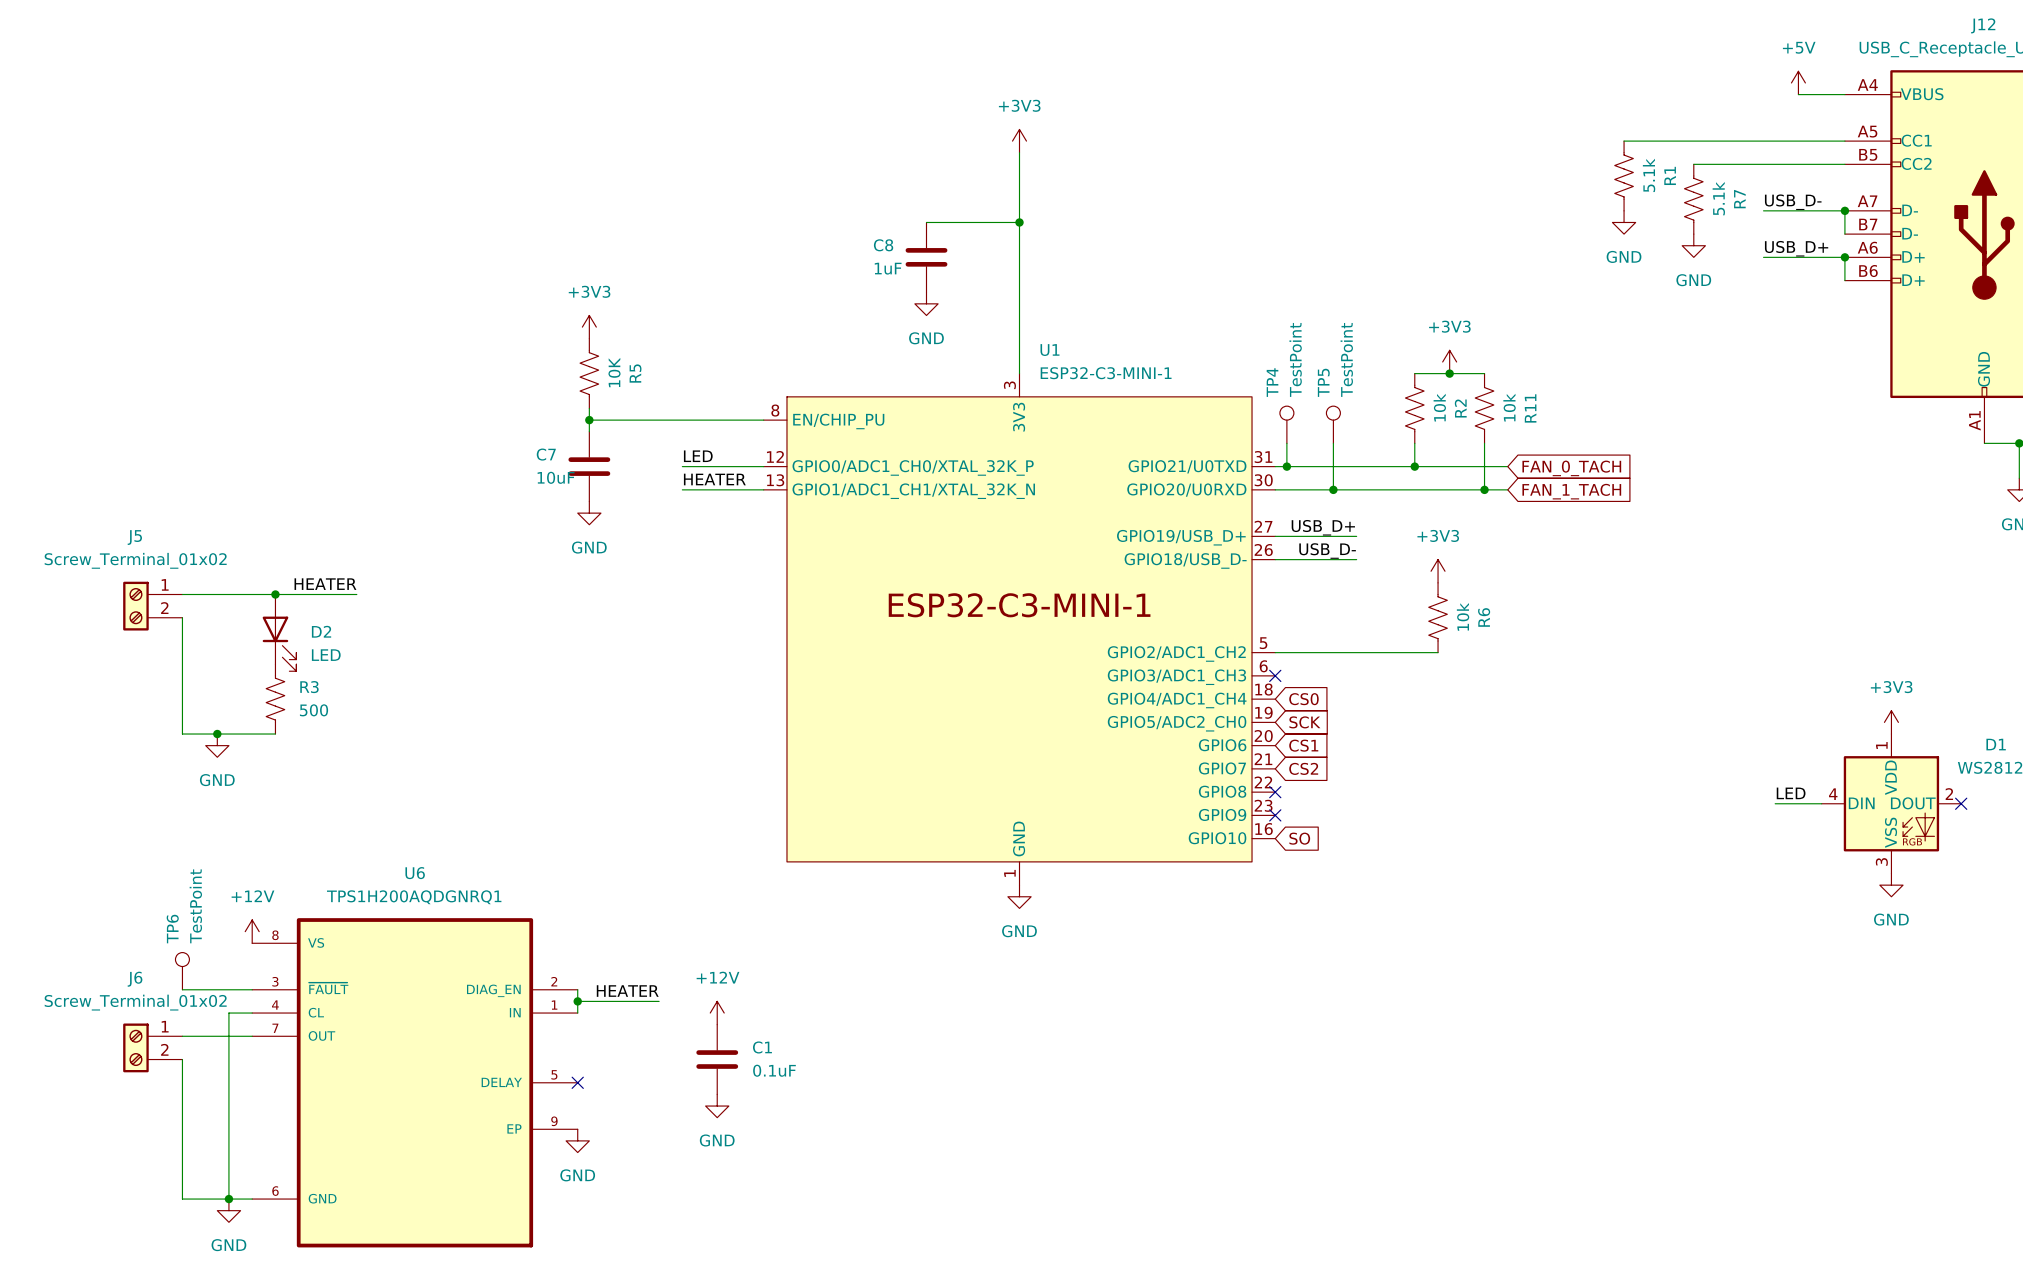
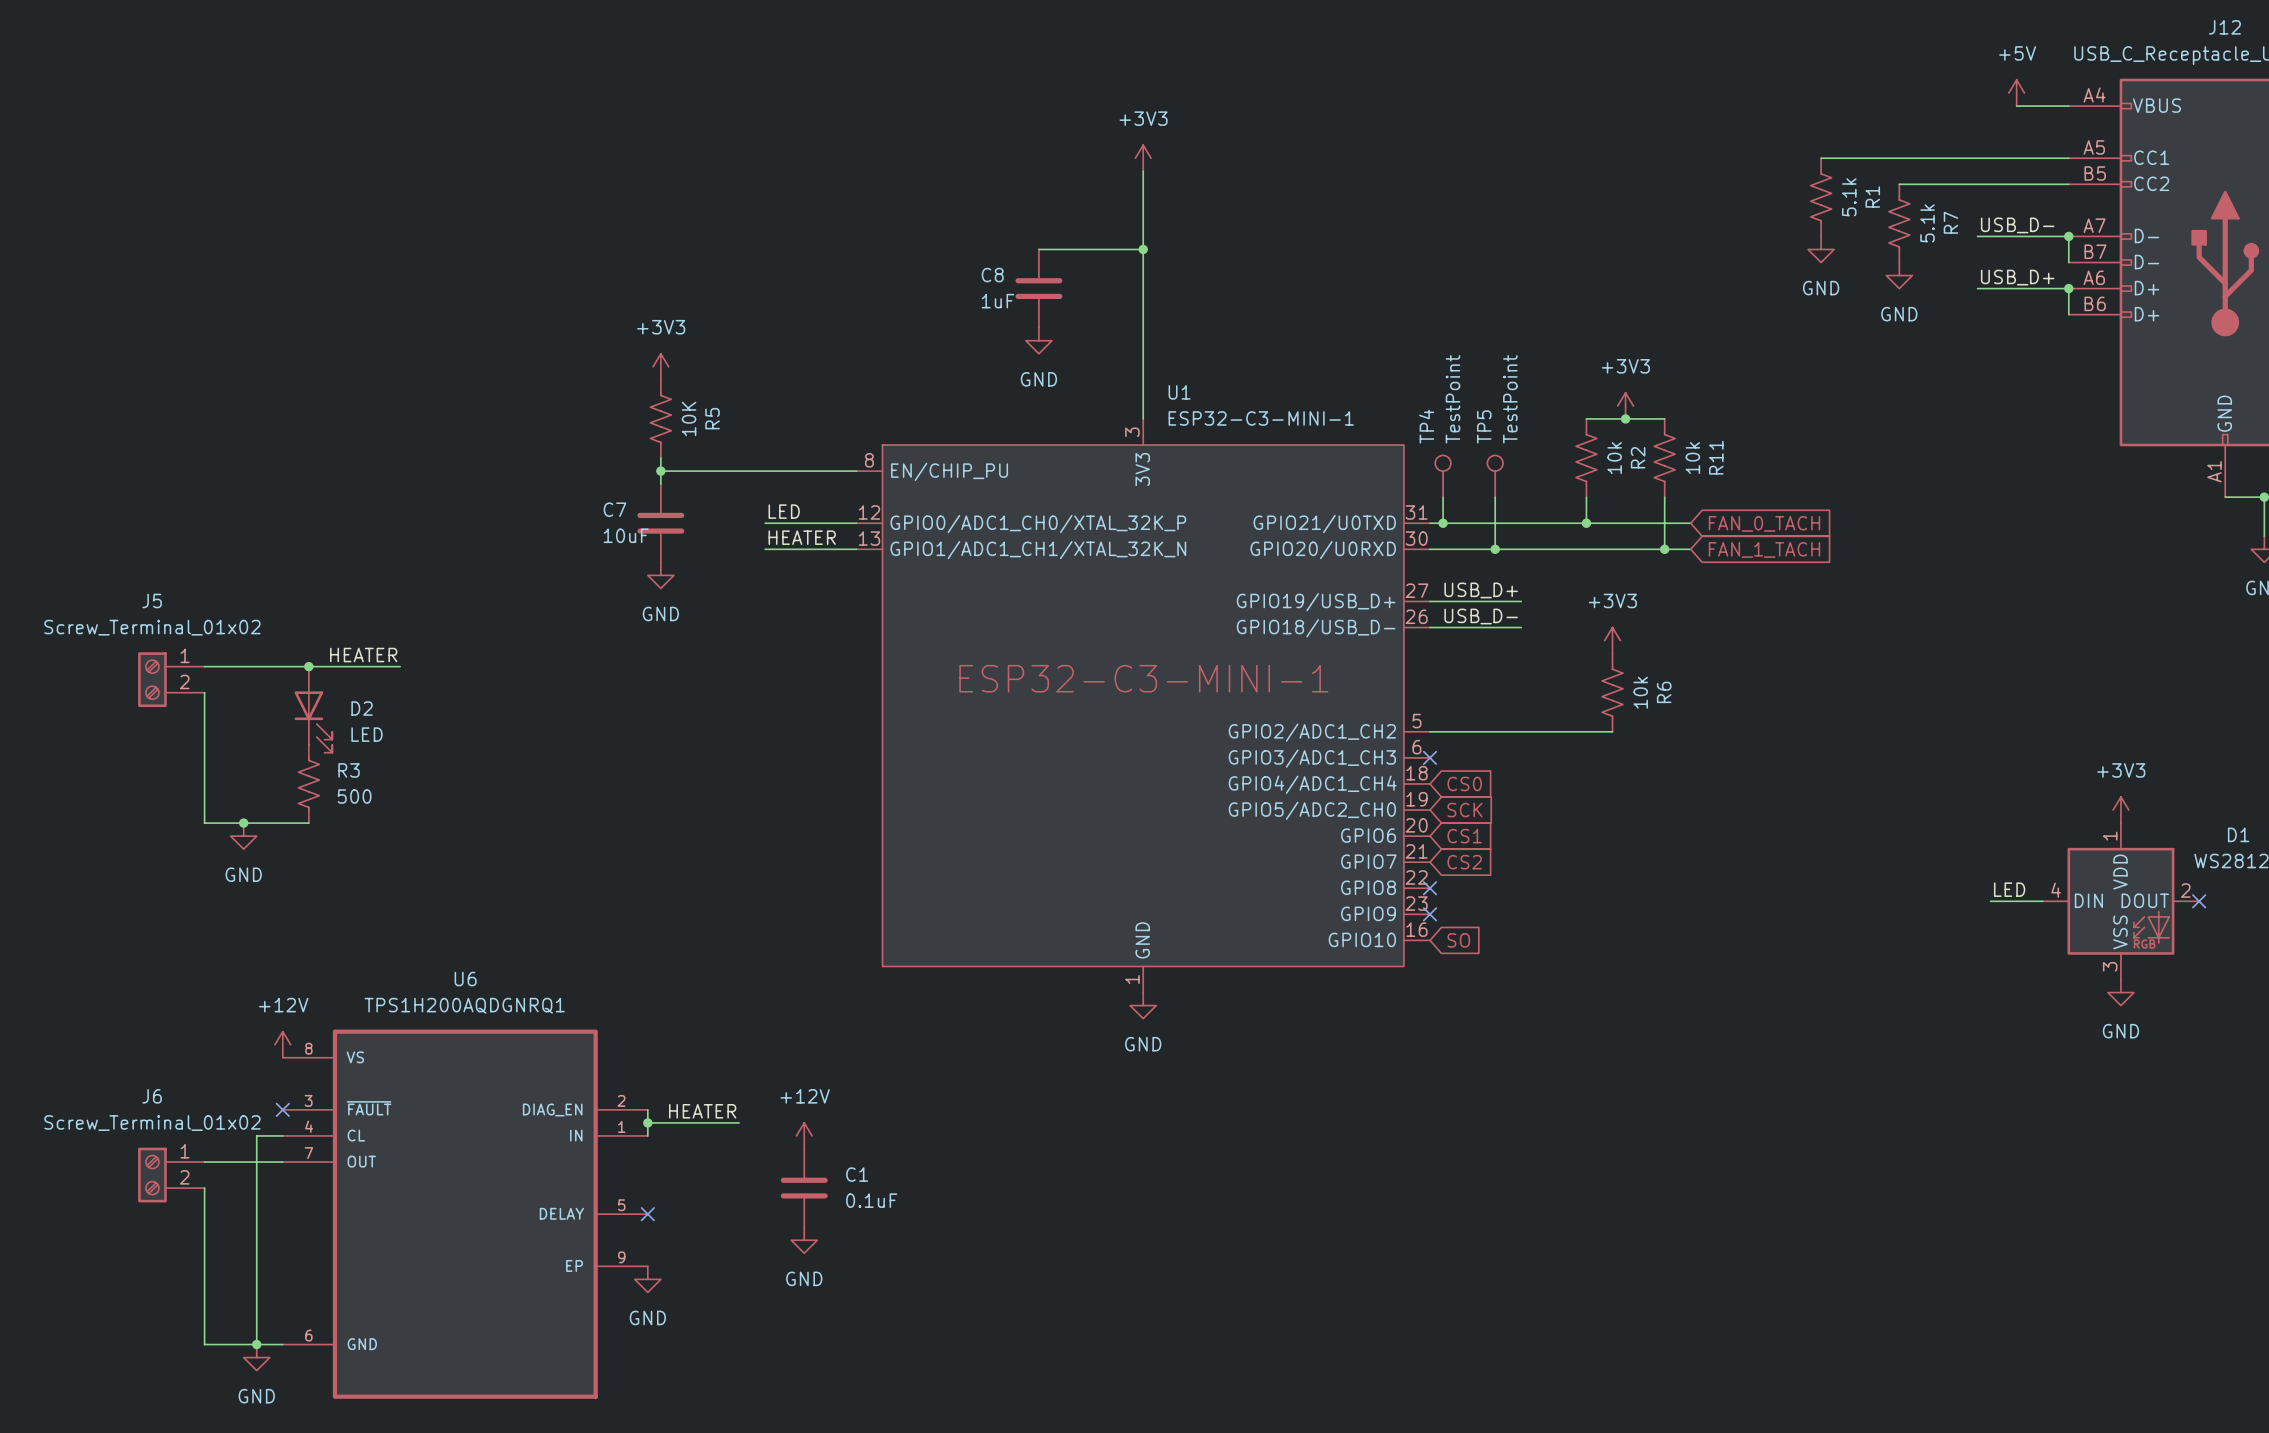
TP6: TestPoint (182, 971) -> none
wire: (182, 989) (252, 989) -> none
no-connect mark: none -> (282, 1109)

